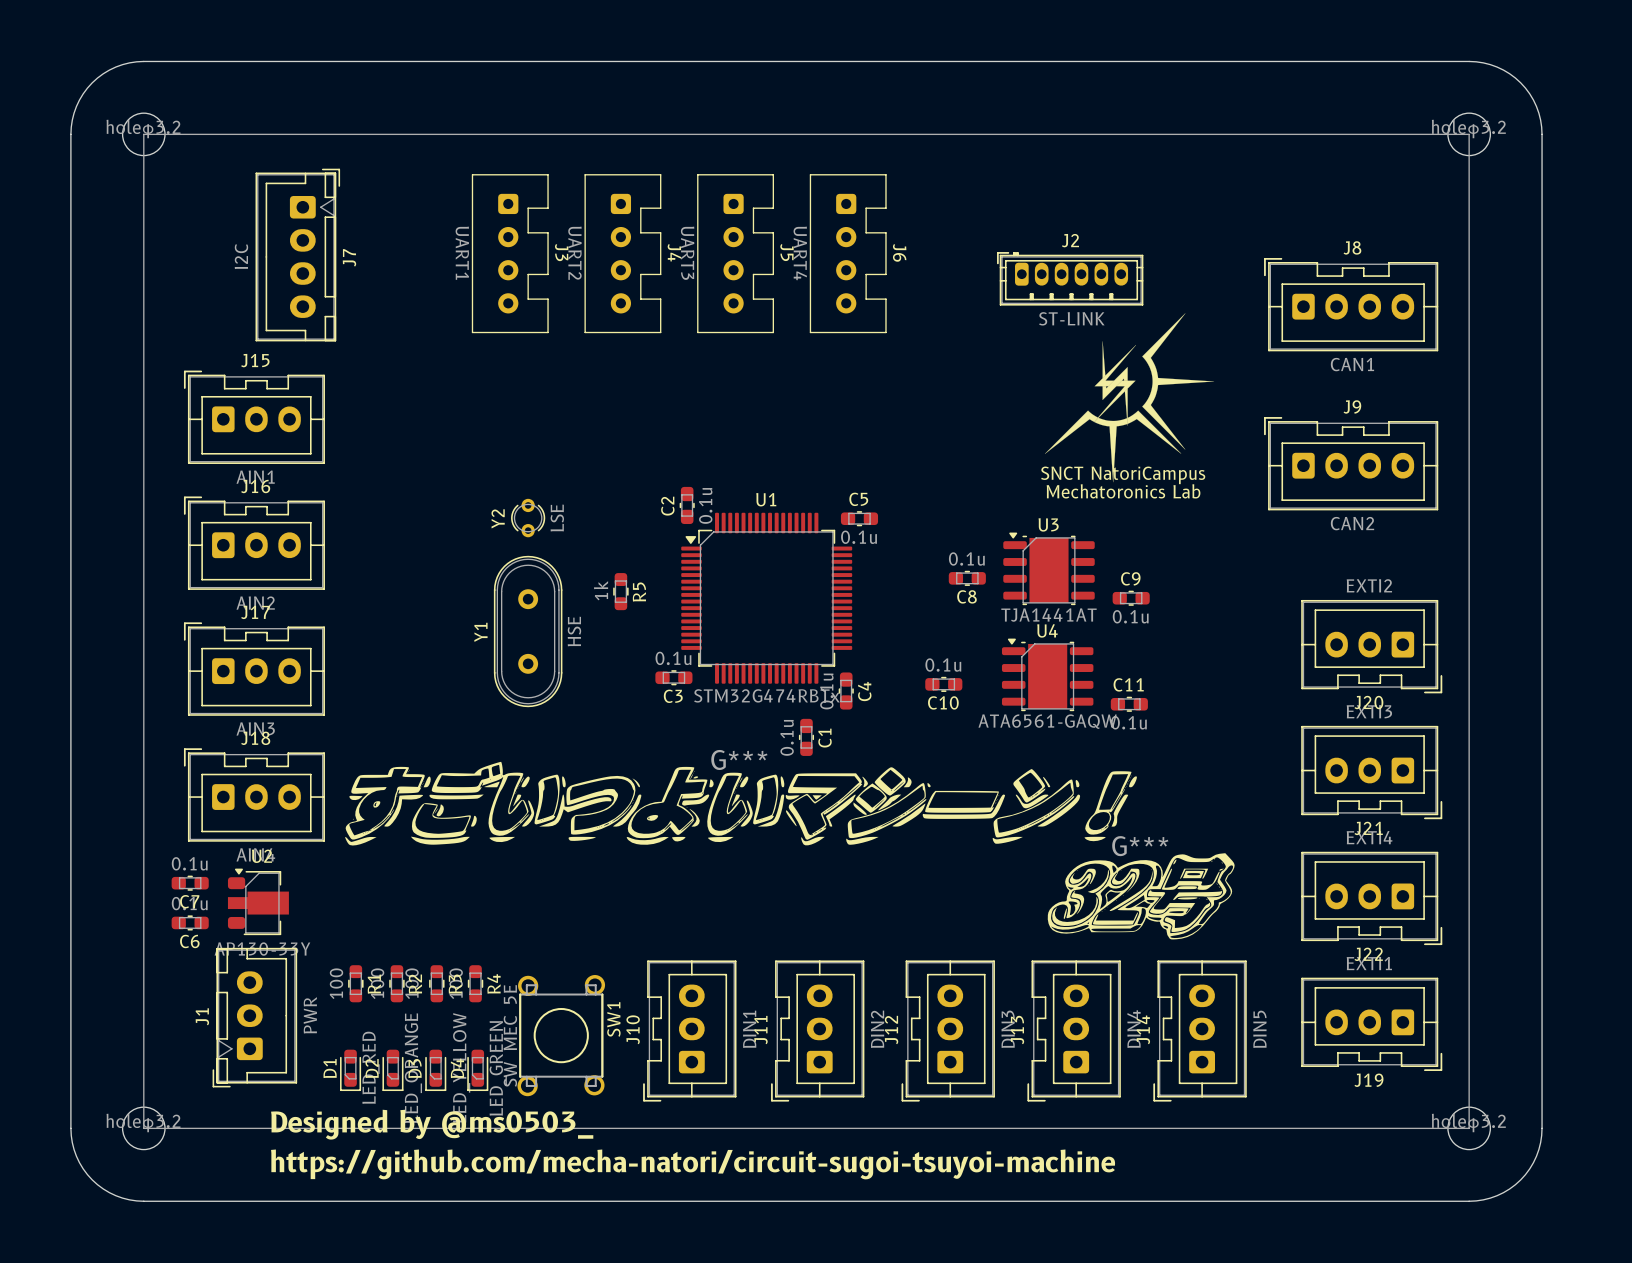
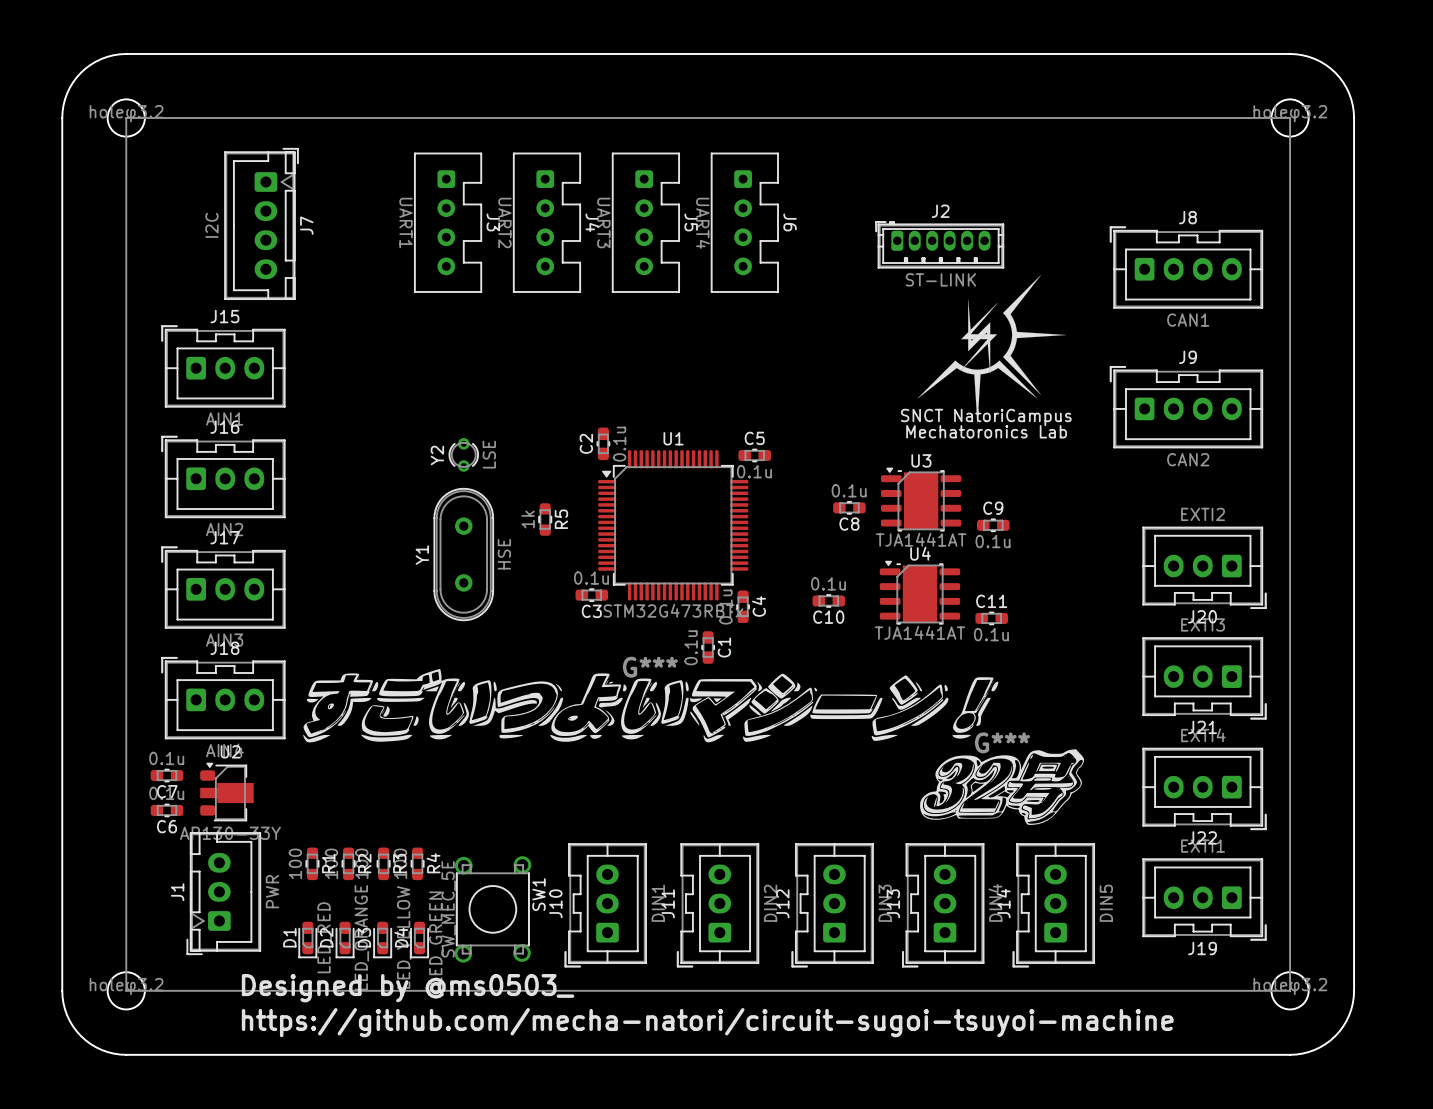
U1 value: STM32G474RBTx (766, 695) -> STM32G473RBTx (673, 610)
U4 value: ATA6561-GAQW (1047, 721) -> TJA1441AT (919, 632)

